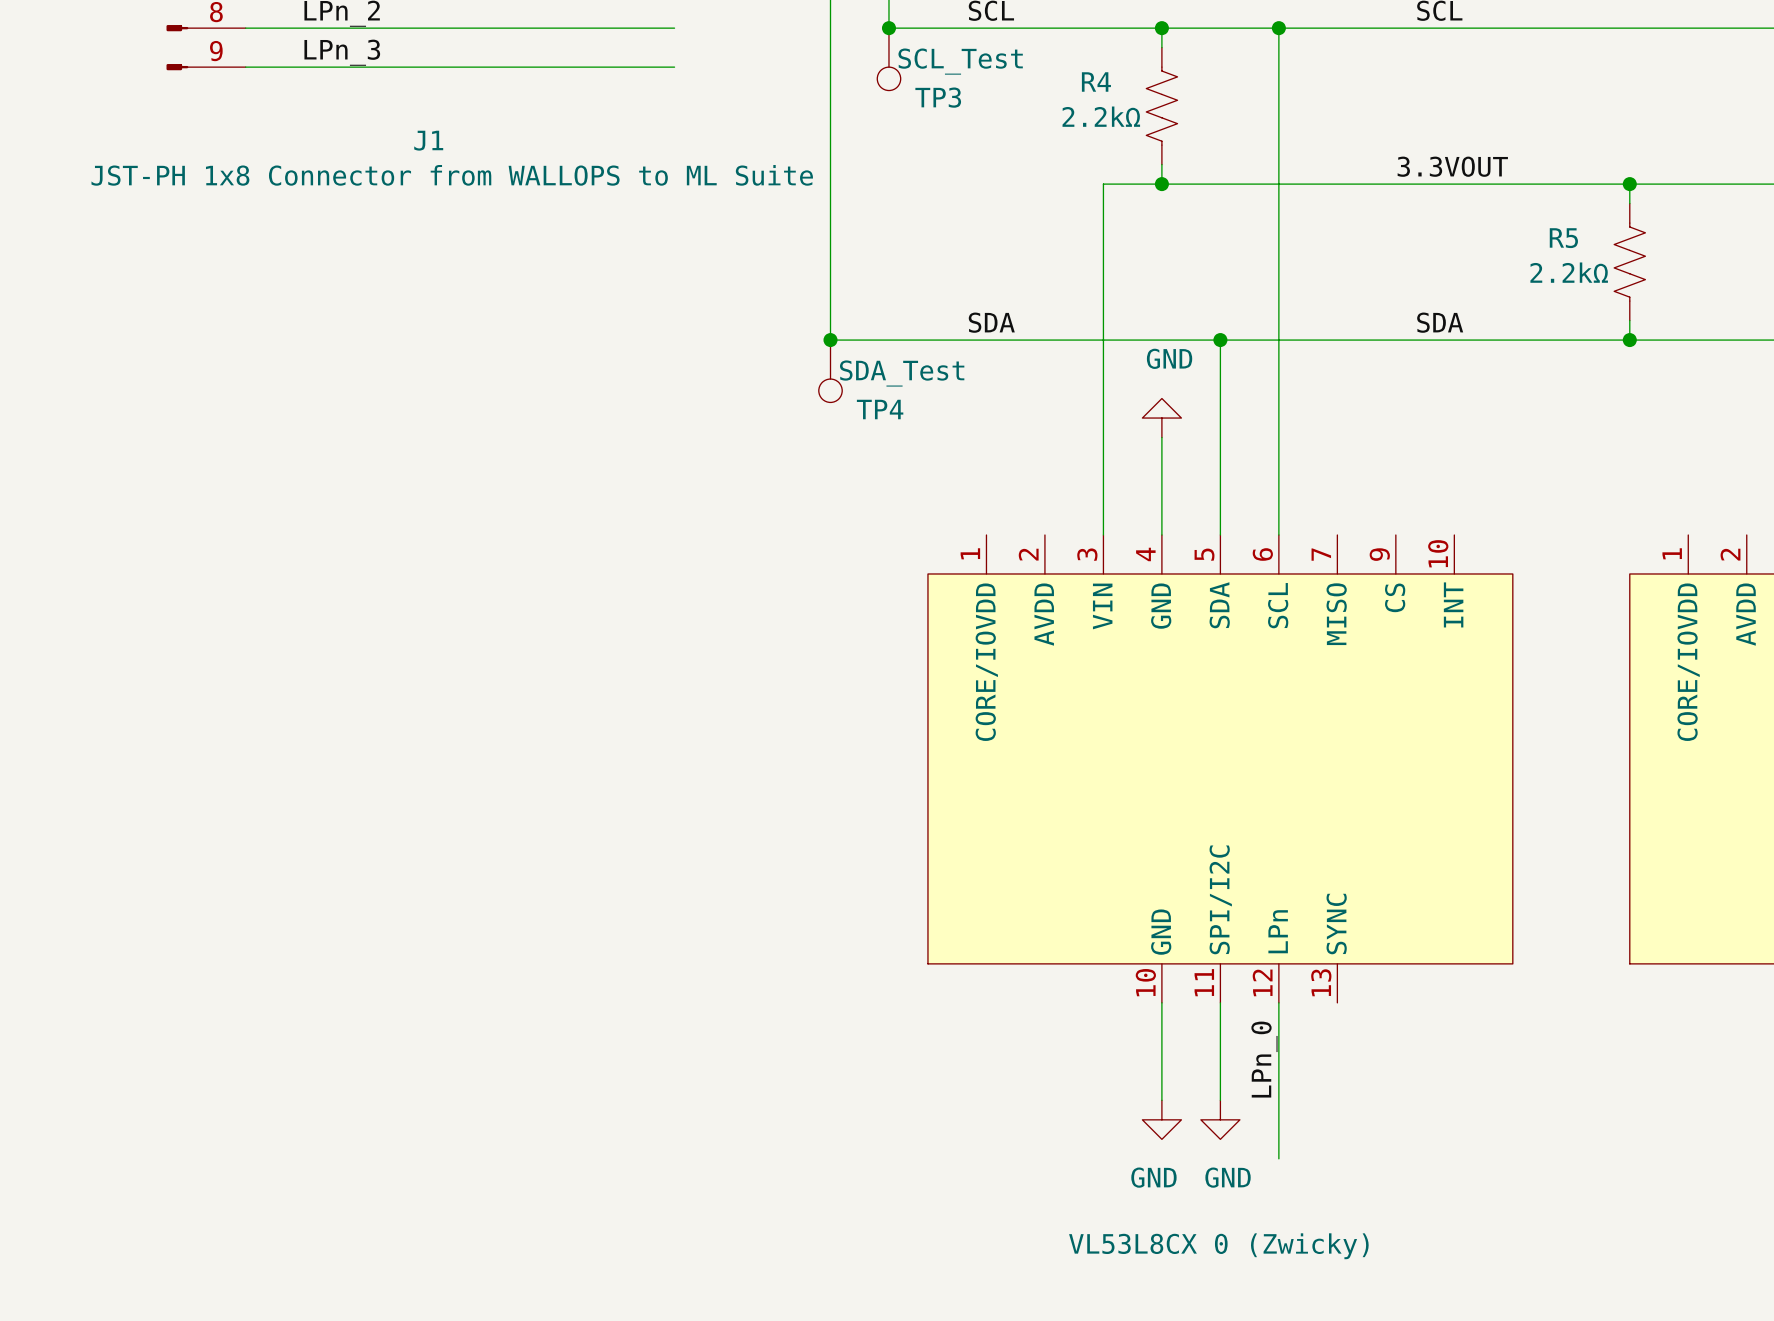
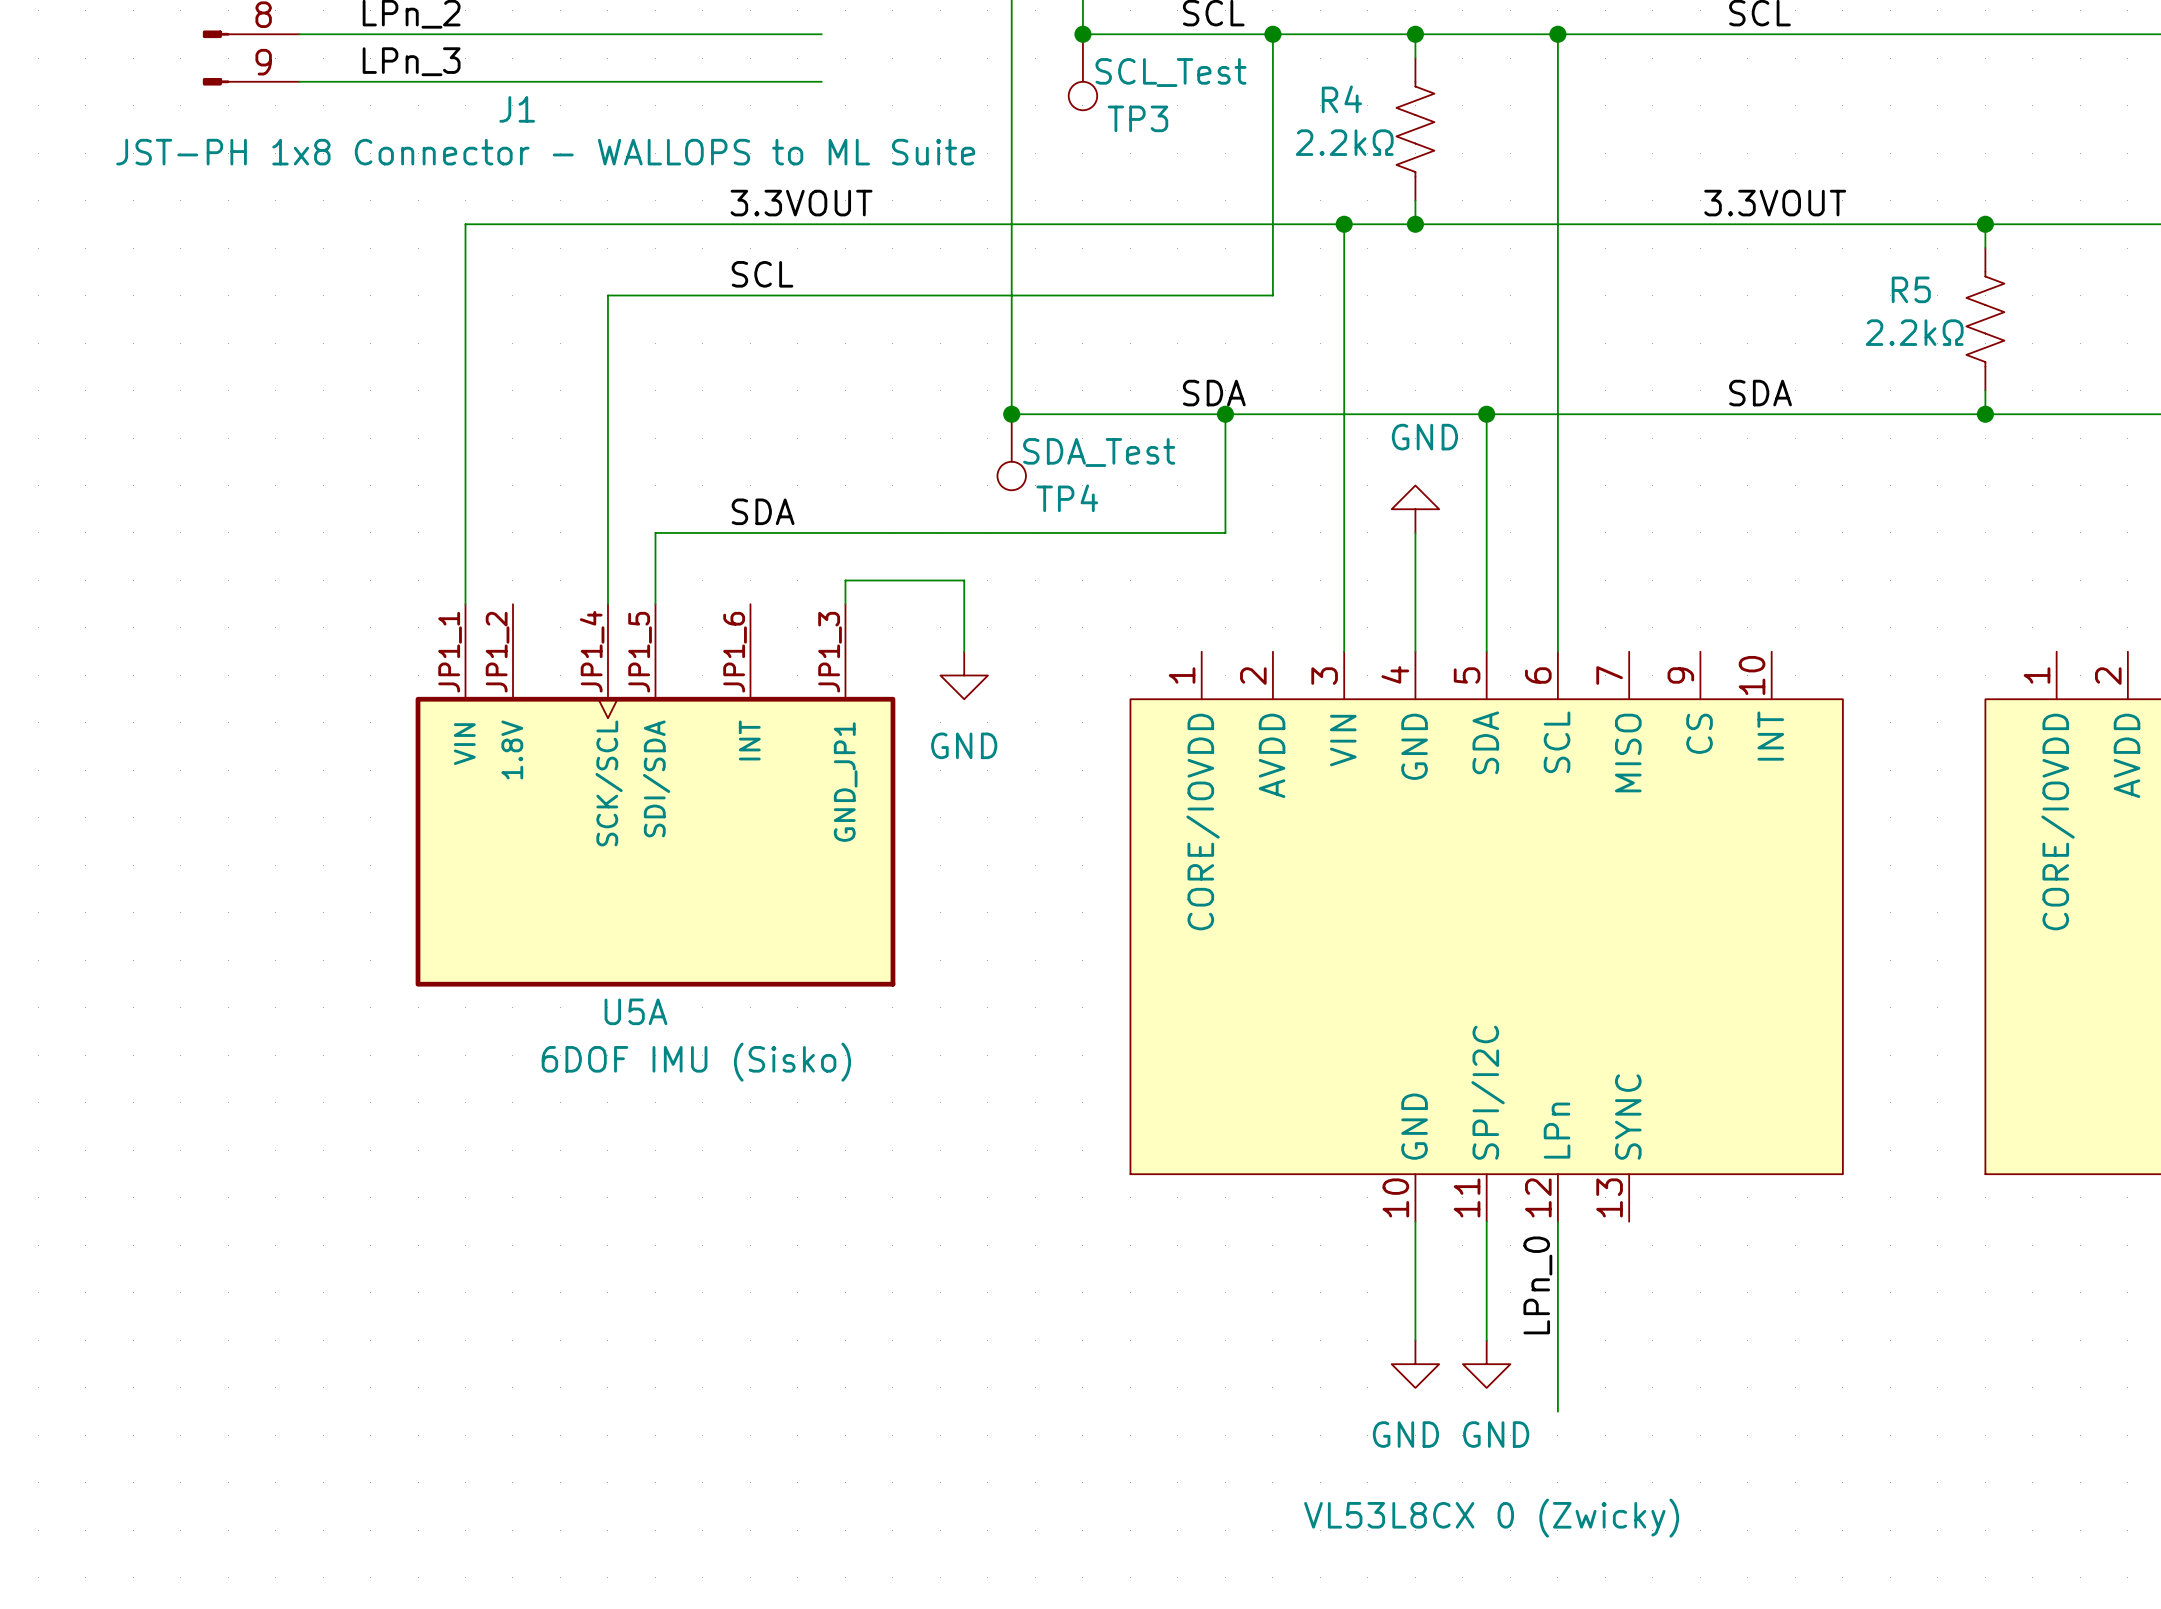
wire: none -> (1272, 34) (1272, 295) (607, 295) (607, 604)
junction: none -> (1272, 34)
J1 name position: J1 (428, 140) -> J1 (517, 109)
label: none -> 3.3VOUT (801, 203)
J1 value: JST-PH 1x8 Connector from WALLOPS to ML Suite (452, 175) -> JST-PH 1x8 Connector - WALLOPS to ML Suite (545, 152)
wire: none -> (1344, 224) (465, 224) (465, 604)
junction: none -> (1344, 224)
label: none -> SCL (762, 274)
wire: none -> (1225, 414) (1225, 532) (655, 532) (655, 604)
junction: none -> (1225, 414)
label: none -> SDA (763, 511)
wire: none -> (845, 604) (845, 580) (964, 580) (964, 651)
power symbol: none -> GND (964, 675)
U5A: none -> 6DOF IMU (Sisko) (655, 795)

